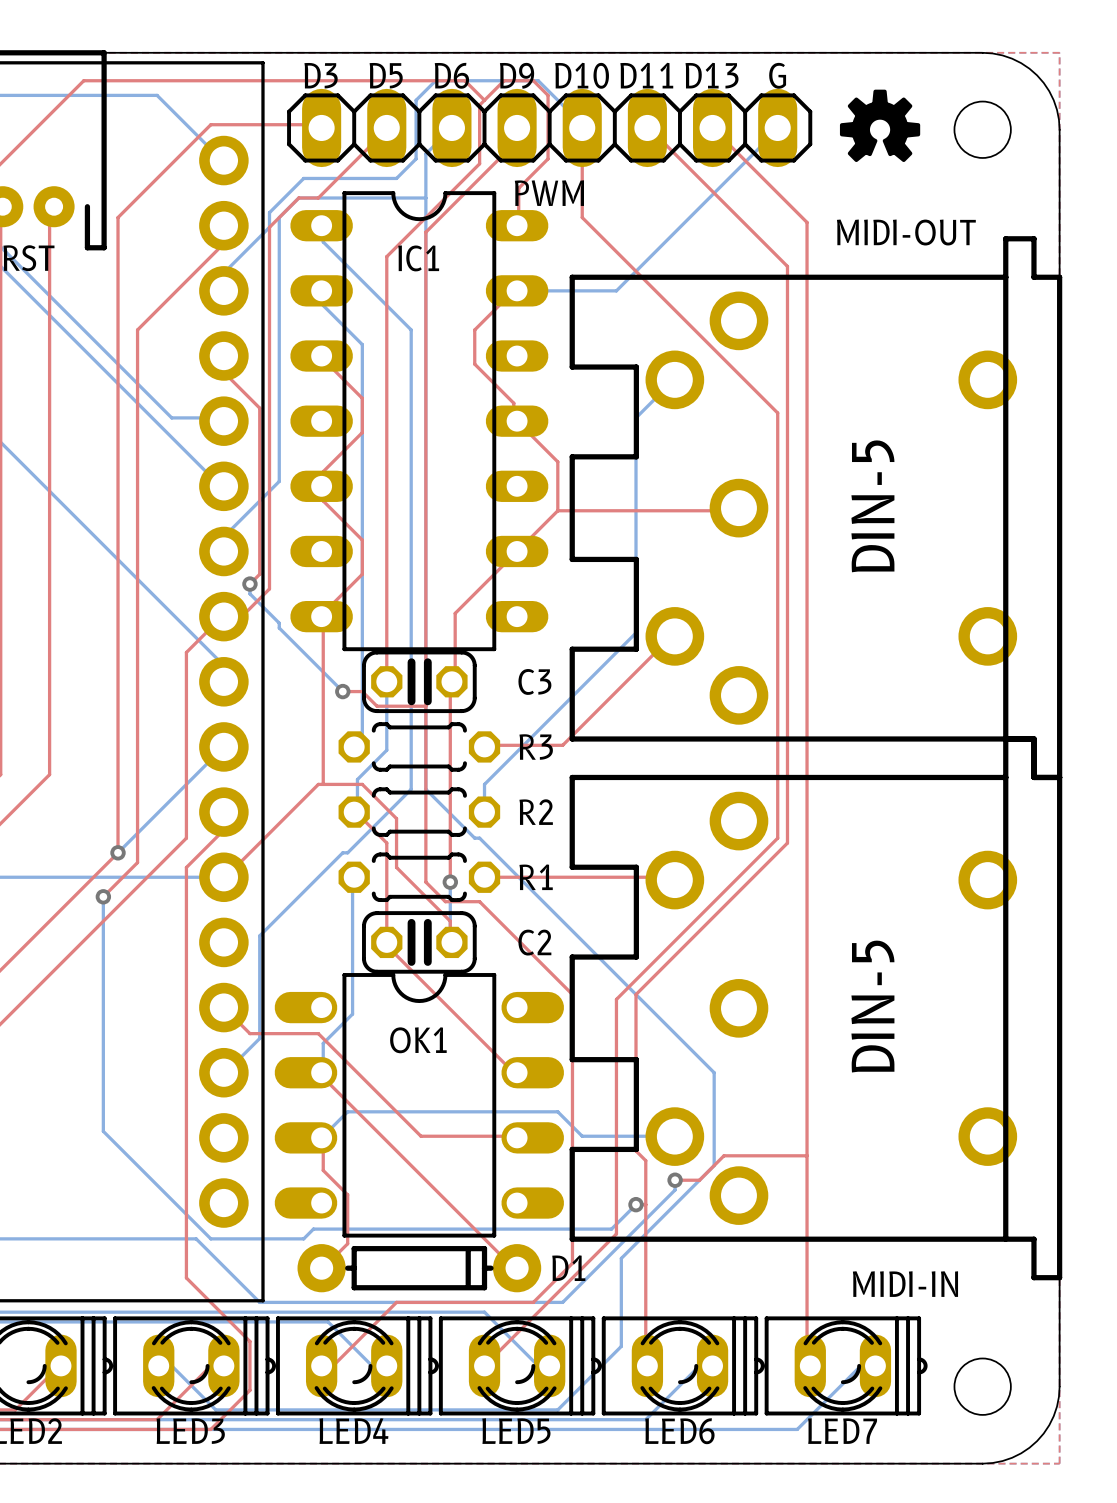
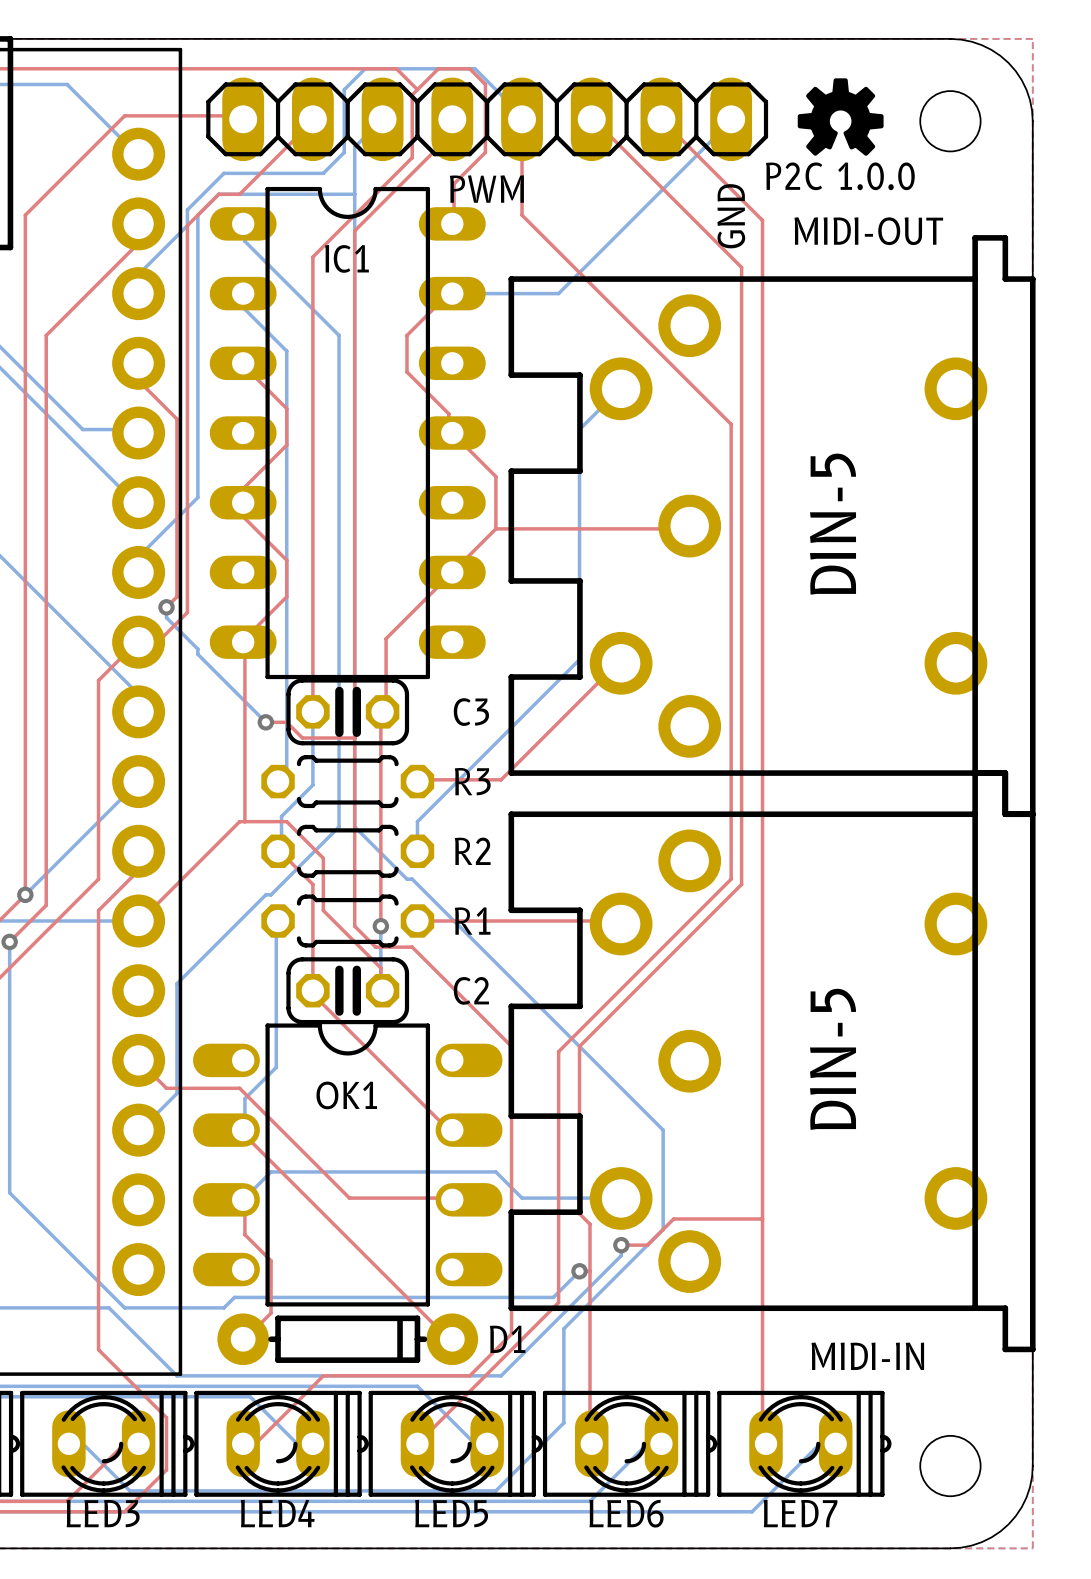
text: D3 (321, 75) -> none
text: D5 (386, 75) -> none
text: D6 (451, 75) -> none
text: D9 (517, 75) -> none
text: D10 (582, 75) -> none
text: D11 (646, 75) -> none
text: D13 (712, 75) -> none
text: G (777, 75) -> none
text: none -> P2C 1.0.0 (840, 176)
text: none -> GND (731, 216)

